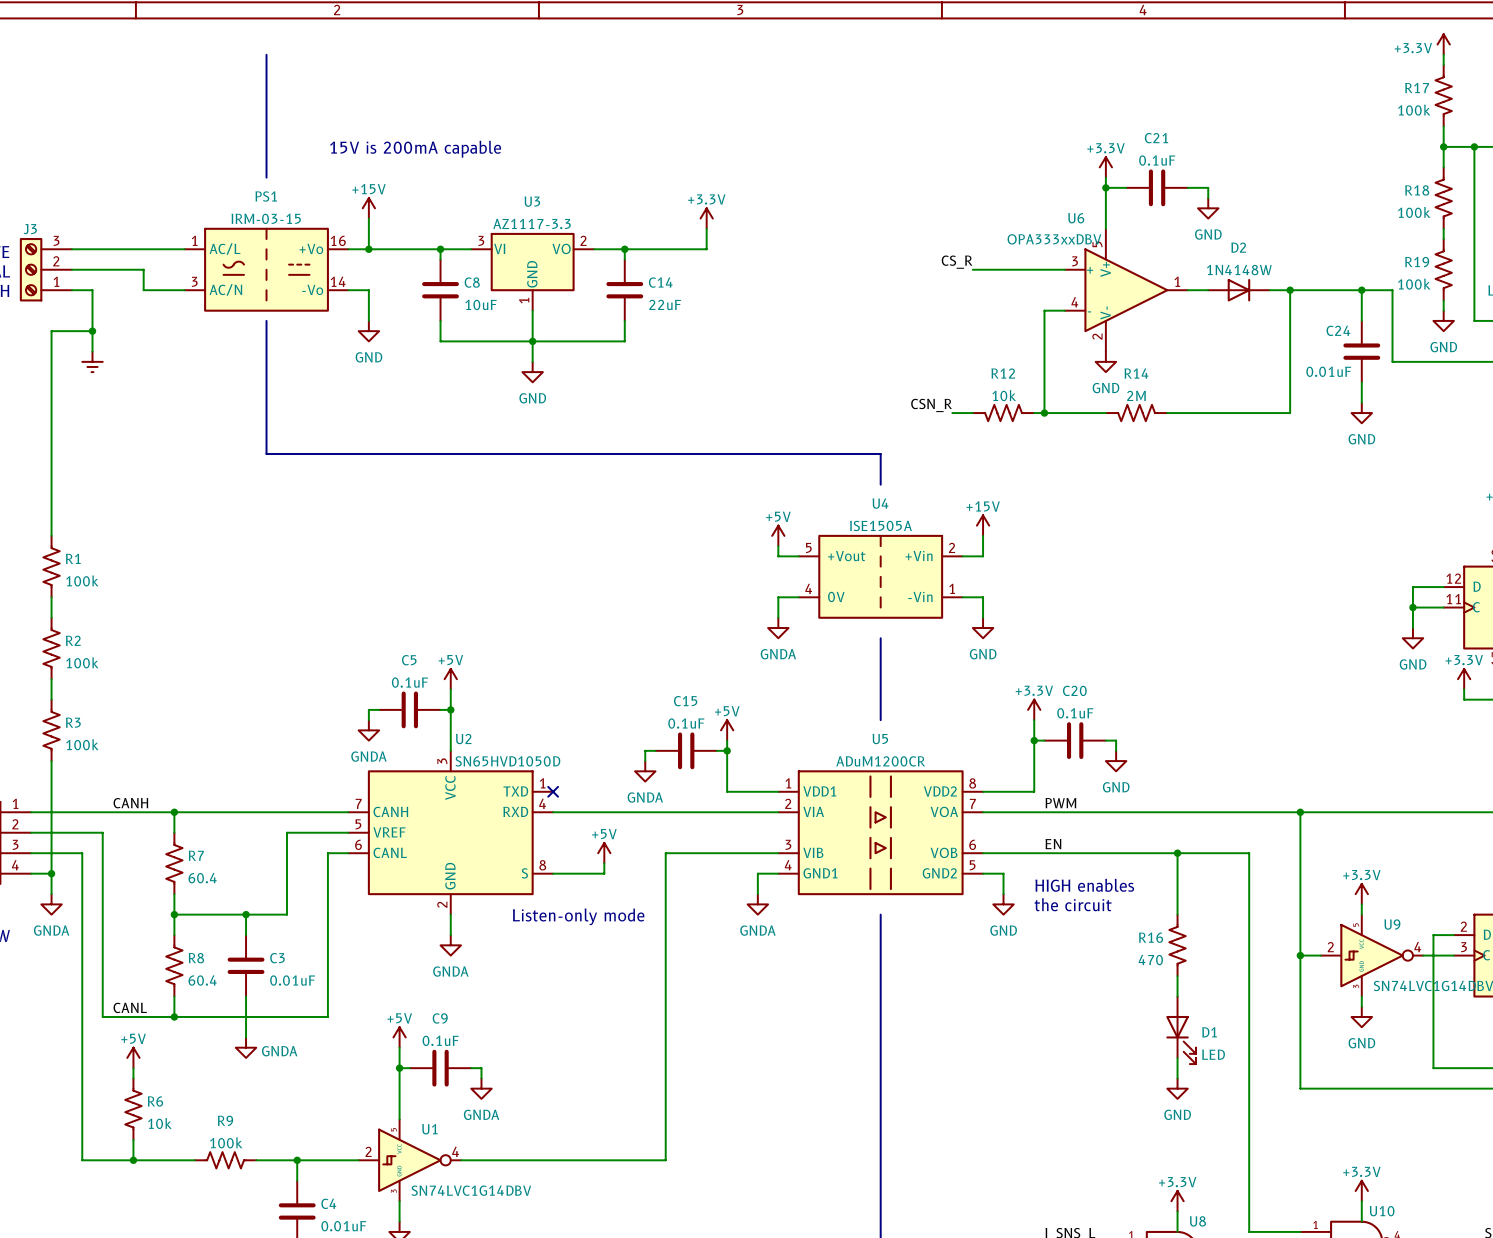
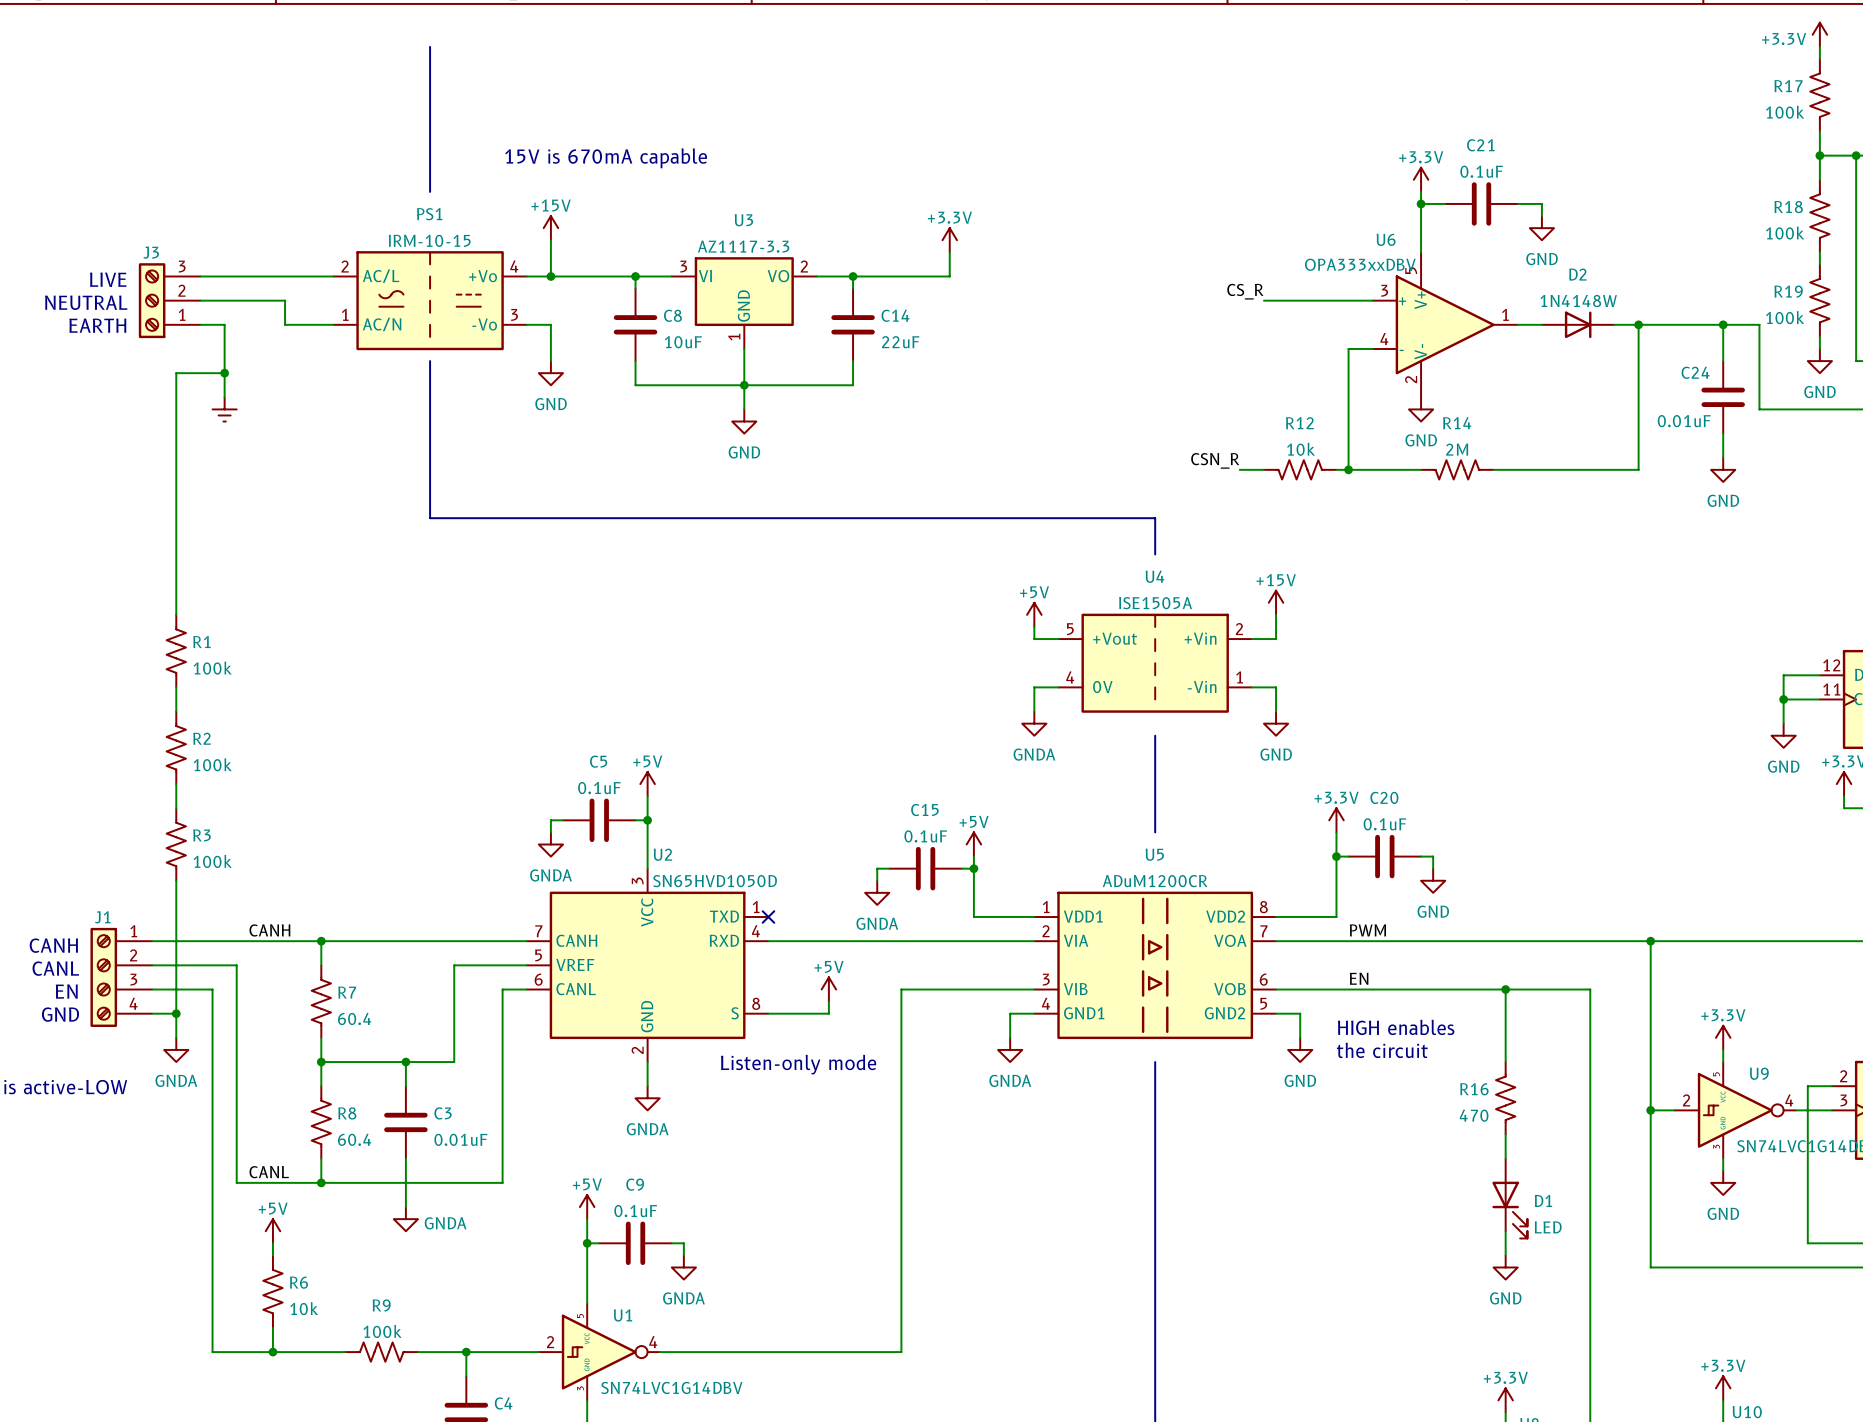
text: 15V is 200mA capable (415, 149) -> 15V is 670mA capable (606, 158)
PS1 value: IRM-03-15 (266, 218) -> IRM-10-15 (429, 240)
PS1 pin number: 1 (194, 240) -> 2 (345, 266)
PS1 pin number: 16 (338, 240) -> 4 (514, 266)
PS1 pin number: 3 (194, 281) -> 1 (345, 314)
PS1 pin number: 14 (338, 281) -> 3 (514, 314)

